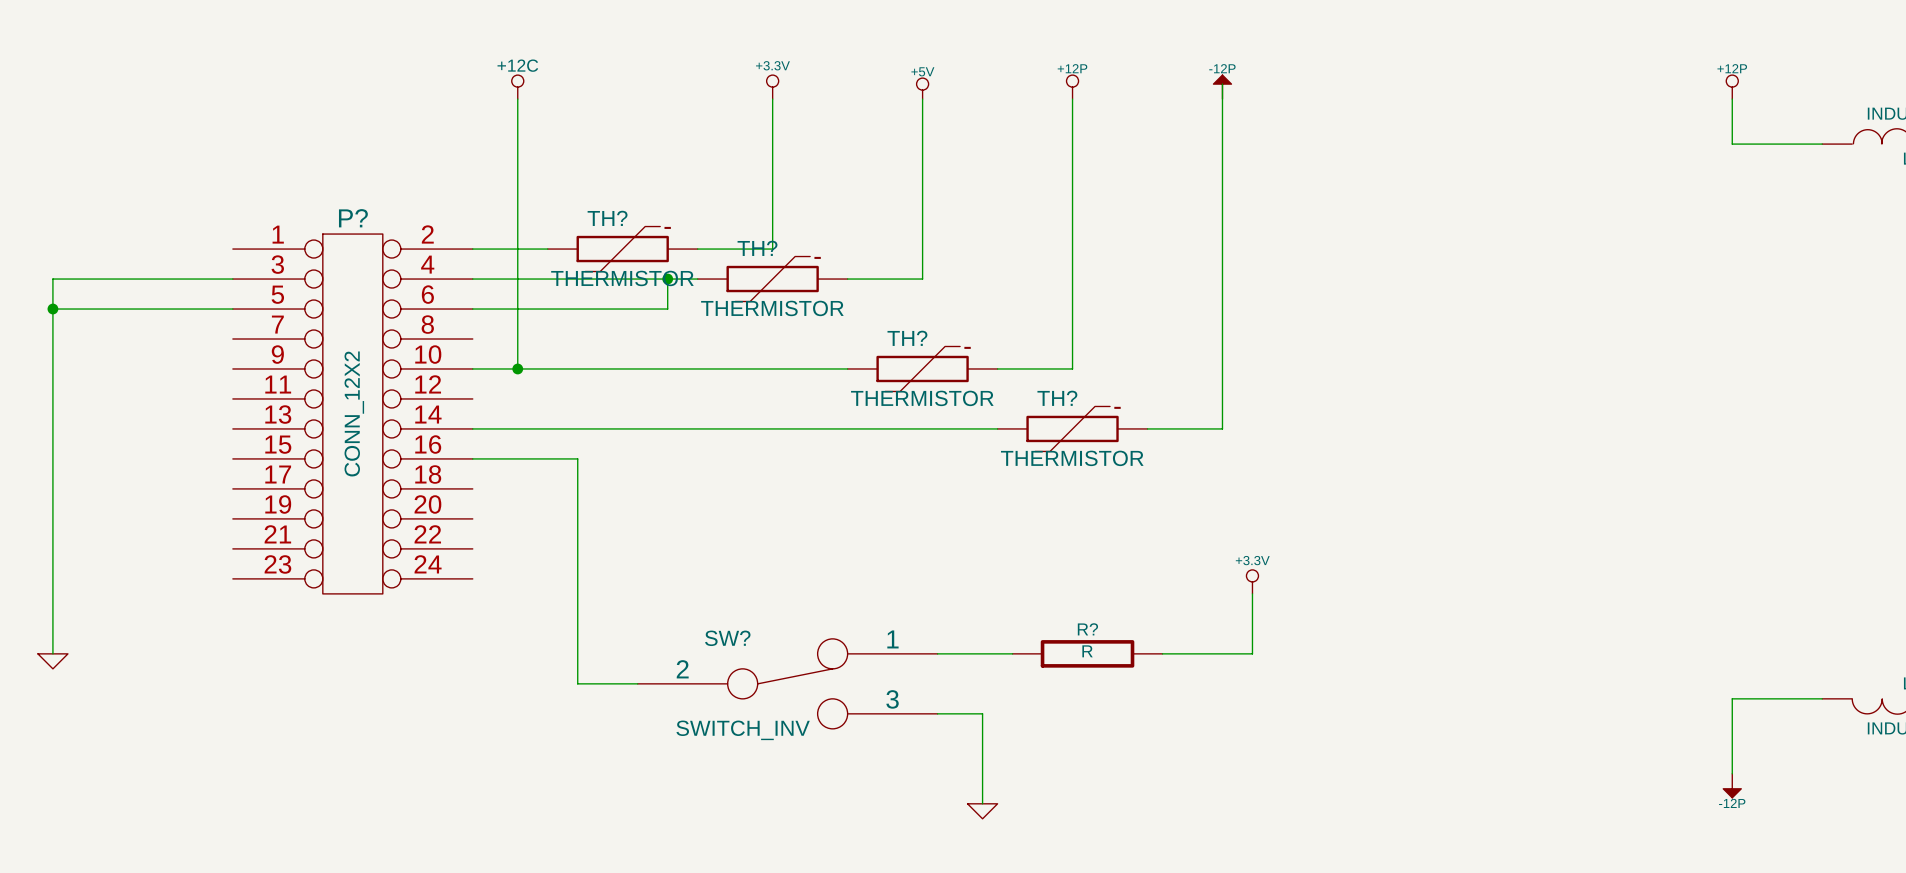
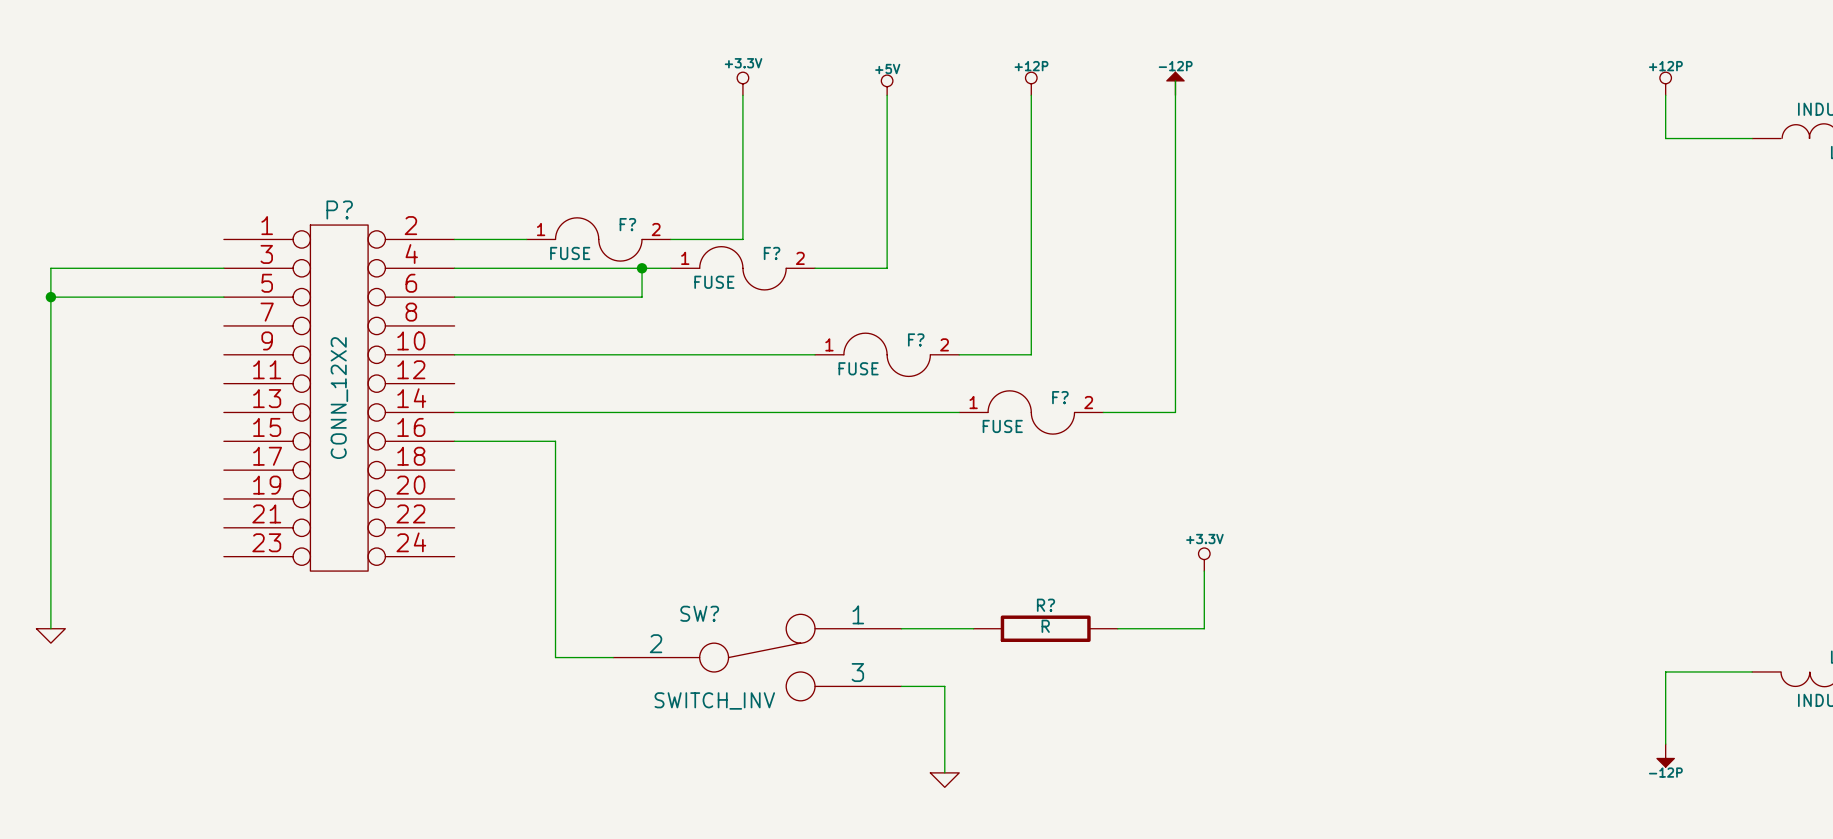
power symbol: +12C (517, 87) -> none
wire: (517, 99) (517, 368) -> none
TH?: THERMISTOR (622, 249) -> none
F?: none -> FUSE (598, 239)
TH?: THERMISTOR (772, 279) -> none
F?: none -> FUSE (742, 268)
junction: (517, 368) -> none
TH?: THERMISTOR (922, 368) -> none
F?: none -> FUSE (887, 354)
TH?: THERMISTOR (1072, 428) -> none
F?: none -> FUSE (1031, 412)

